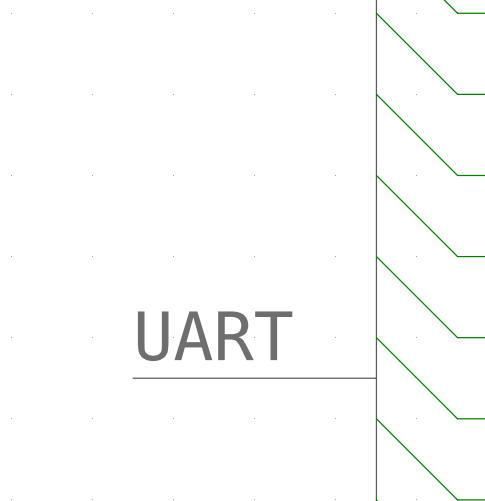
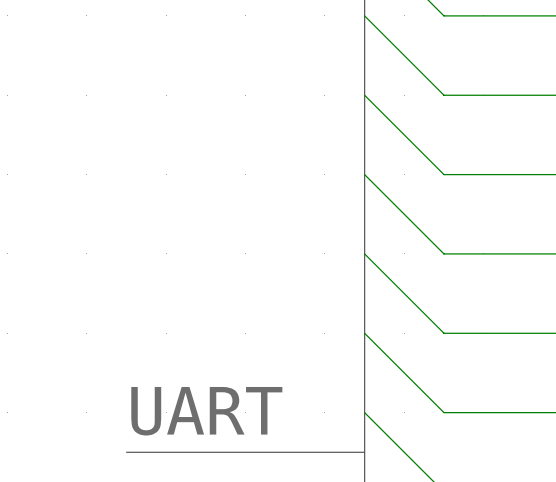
label position: UART (215, 336) -> UART (206, 411)
bus: (133, 378) (376, 378) -> (126, 452) (364, 452)

